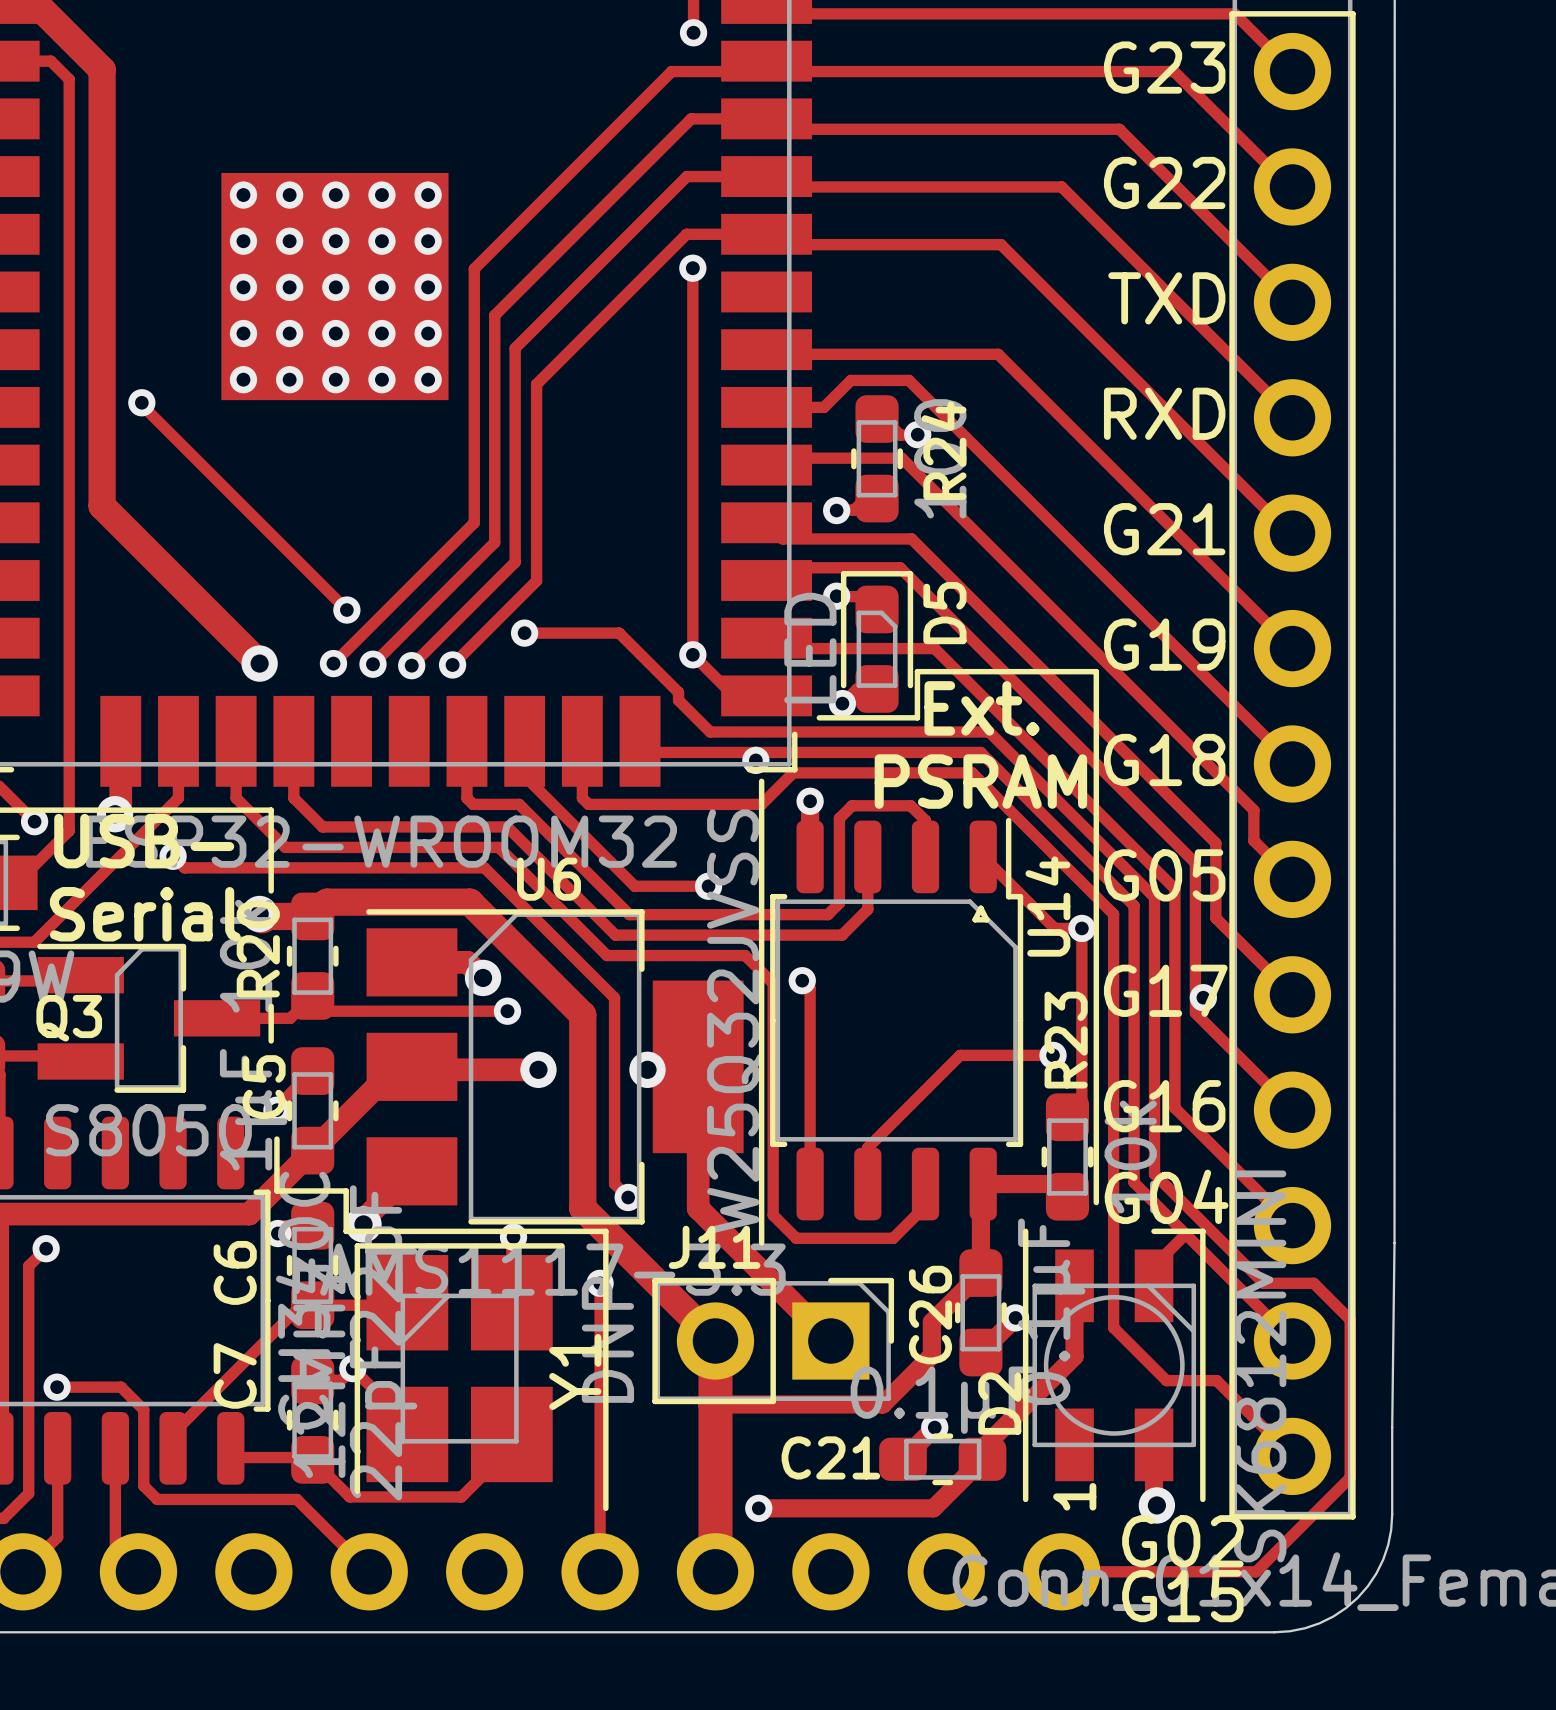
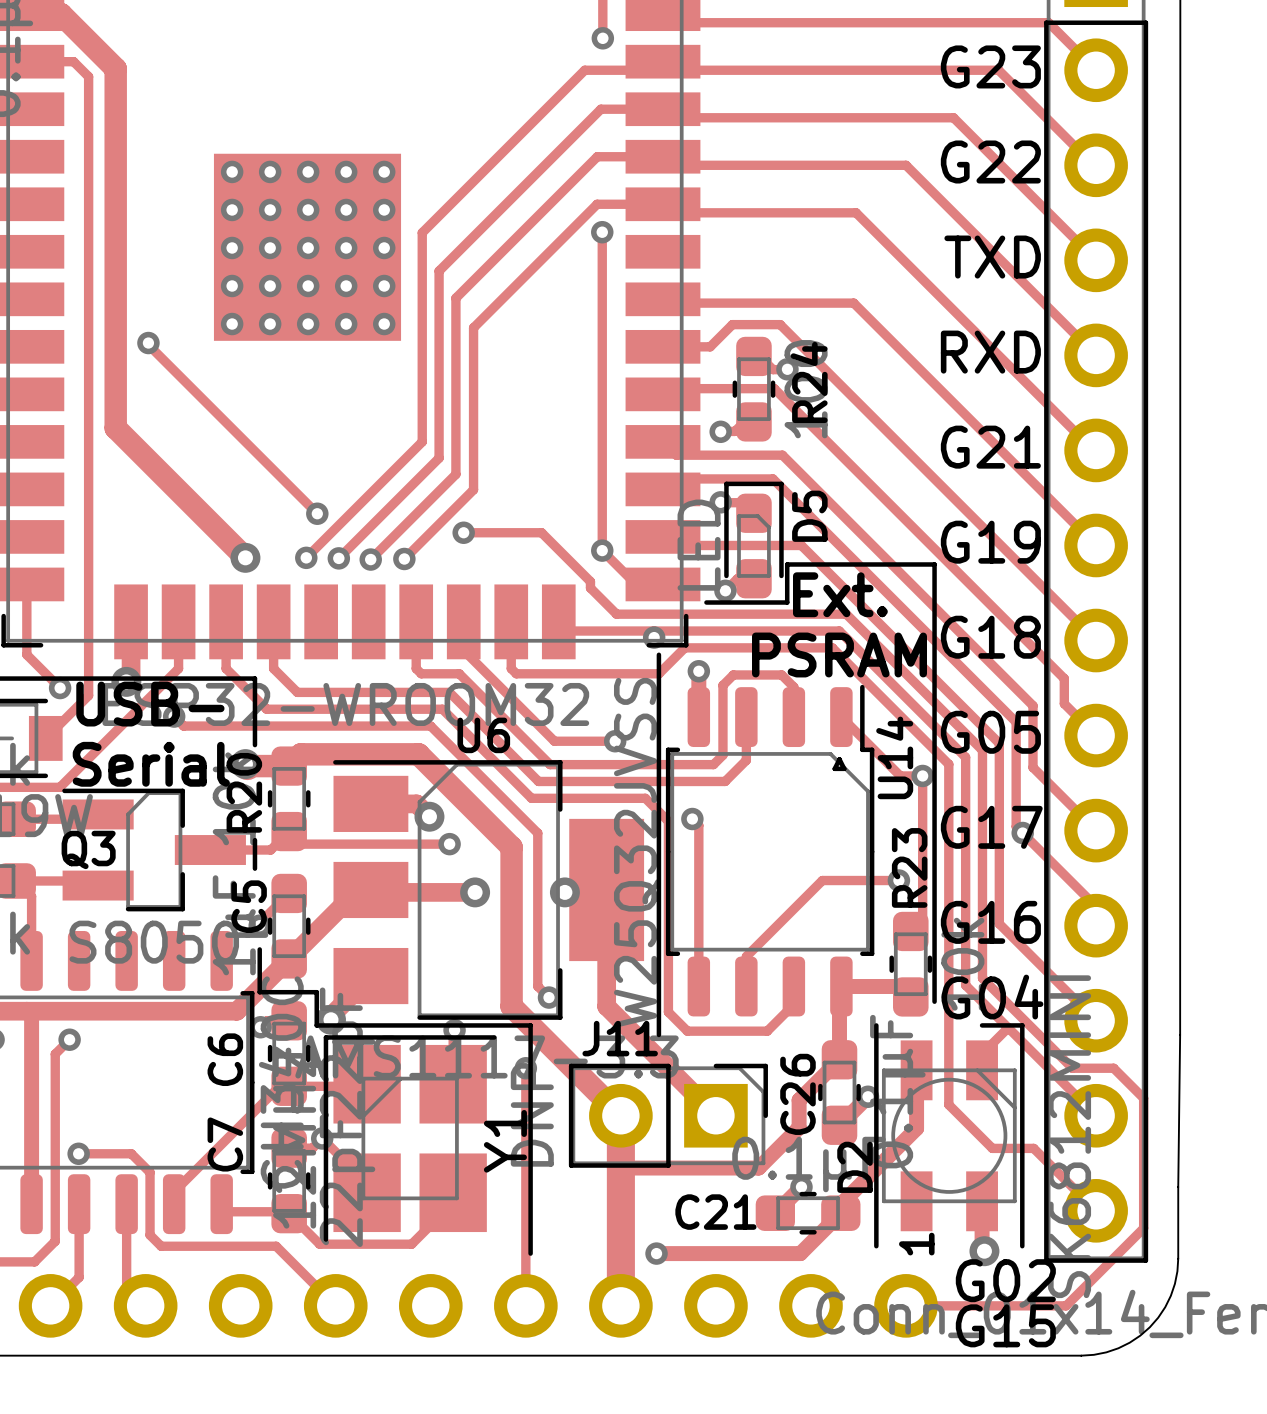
track: (1195, 990) (1195, 1013) (1292, 1110) -> (1016, 826) (1096, 906) (1096, 925)

